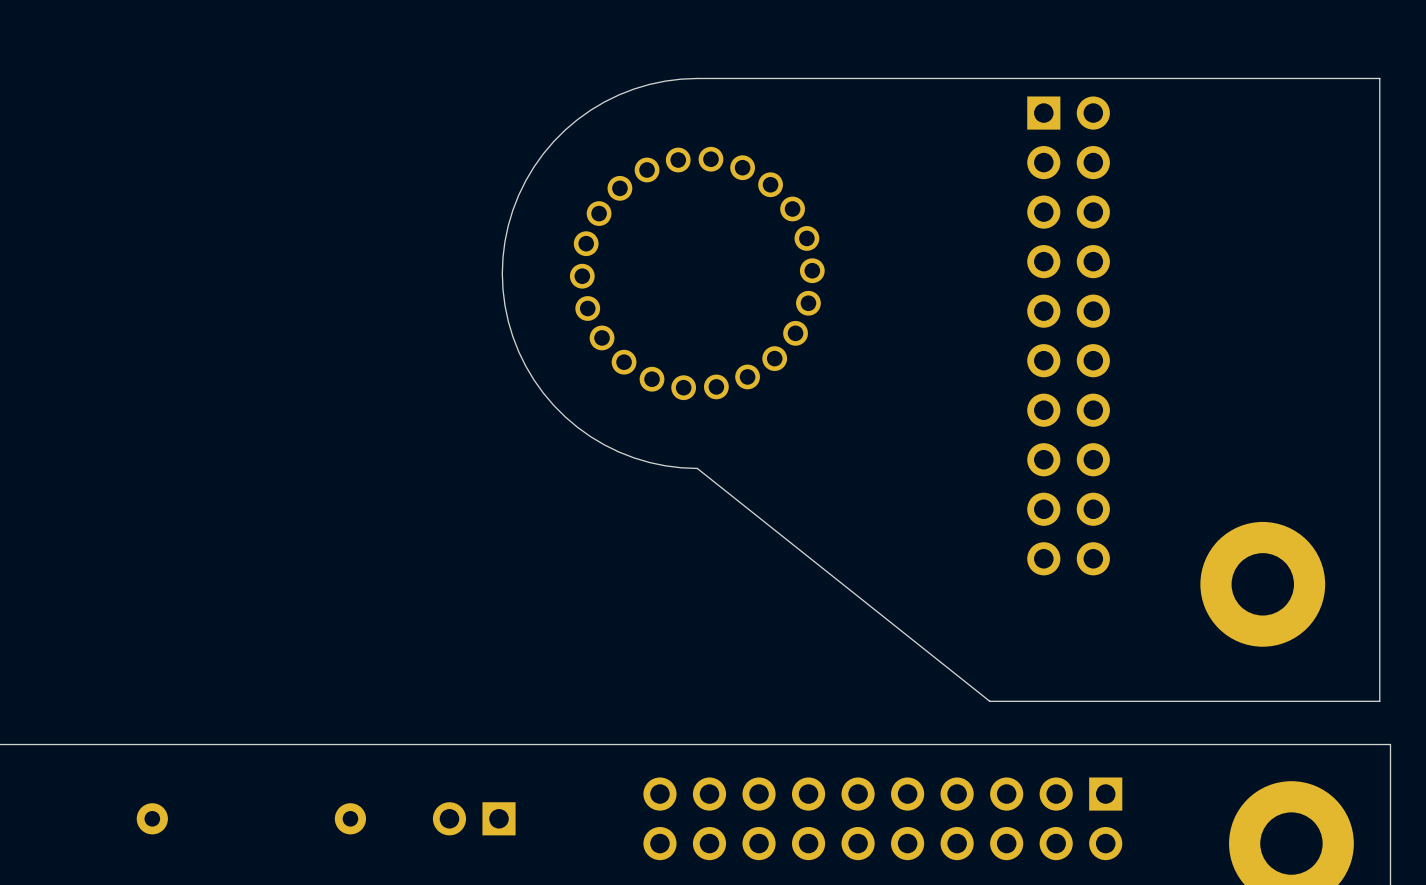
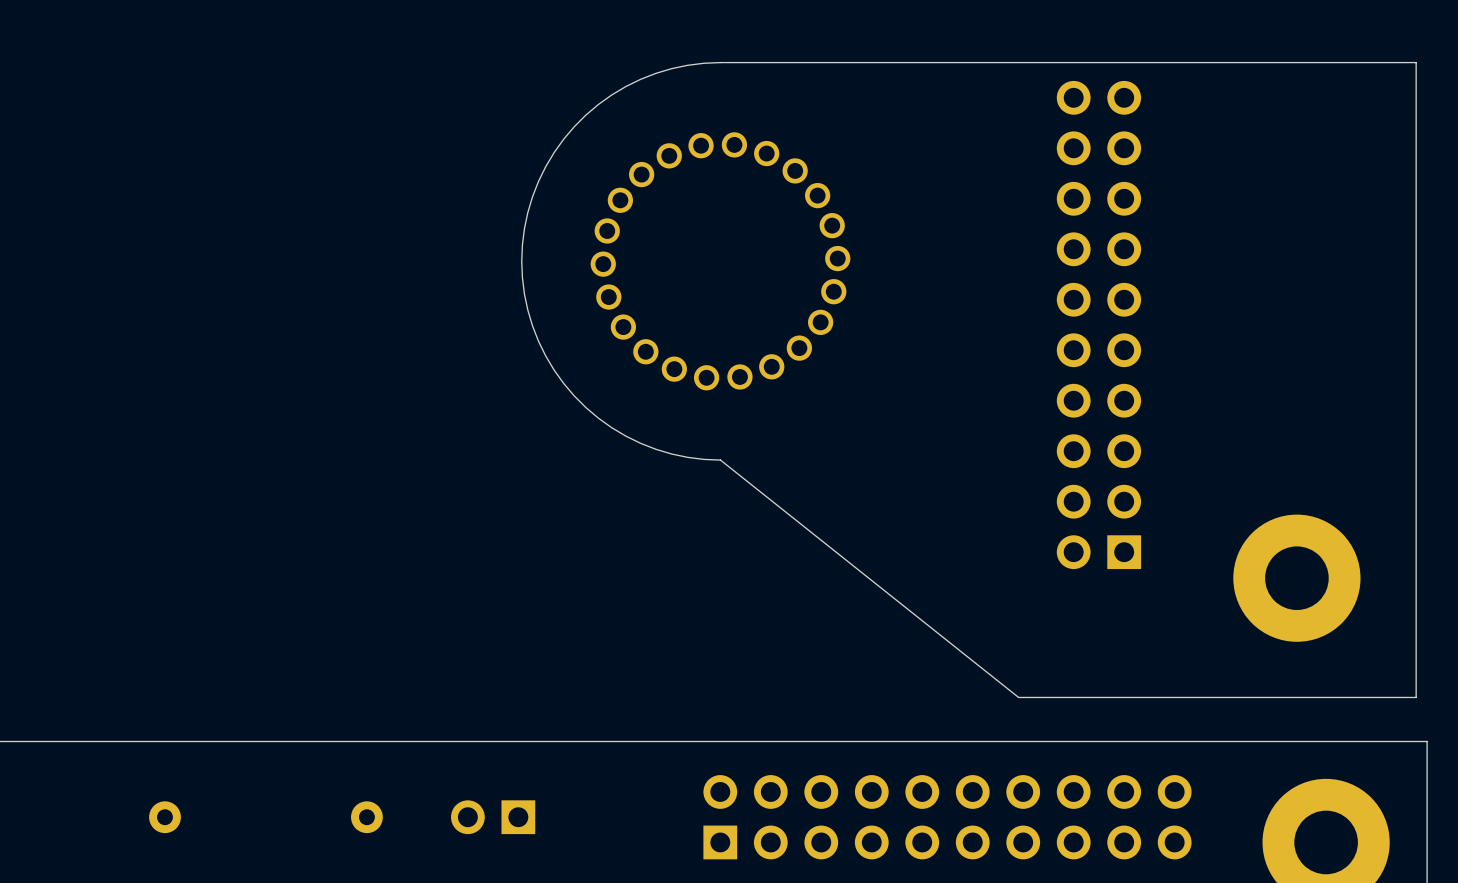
part rotation: 0° (1068, 335) -> 180° (1098, 324)
part rotation: 0° (882, 818) -> 180° (947, 817)

